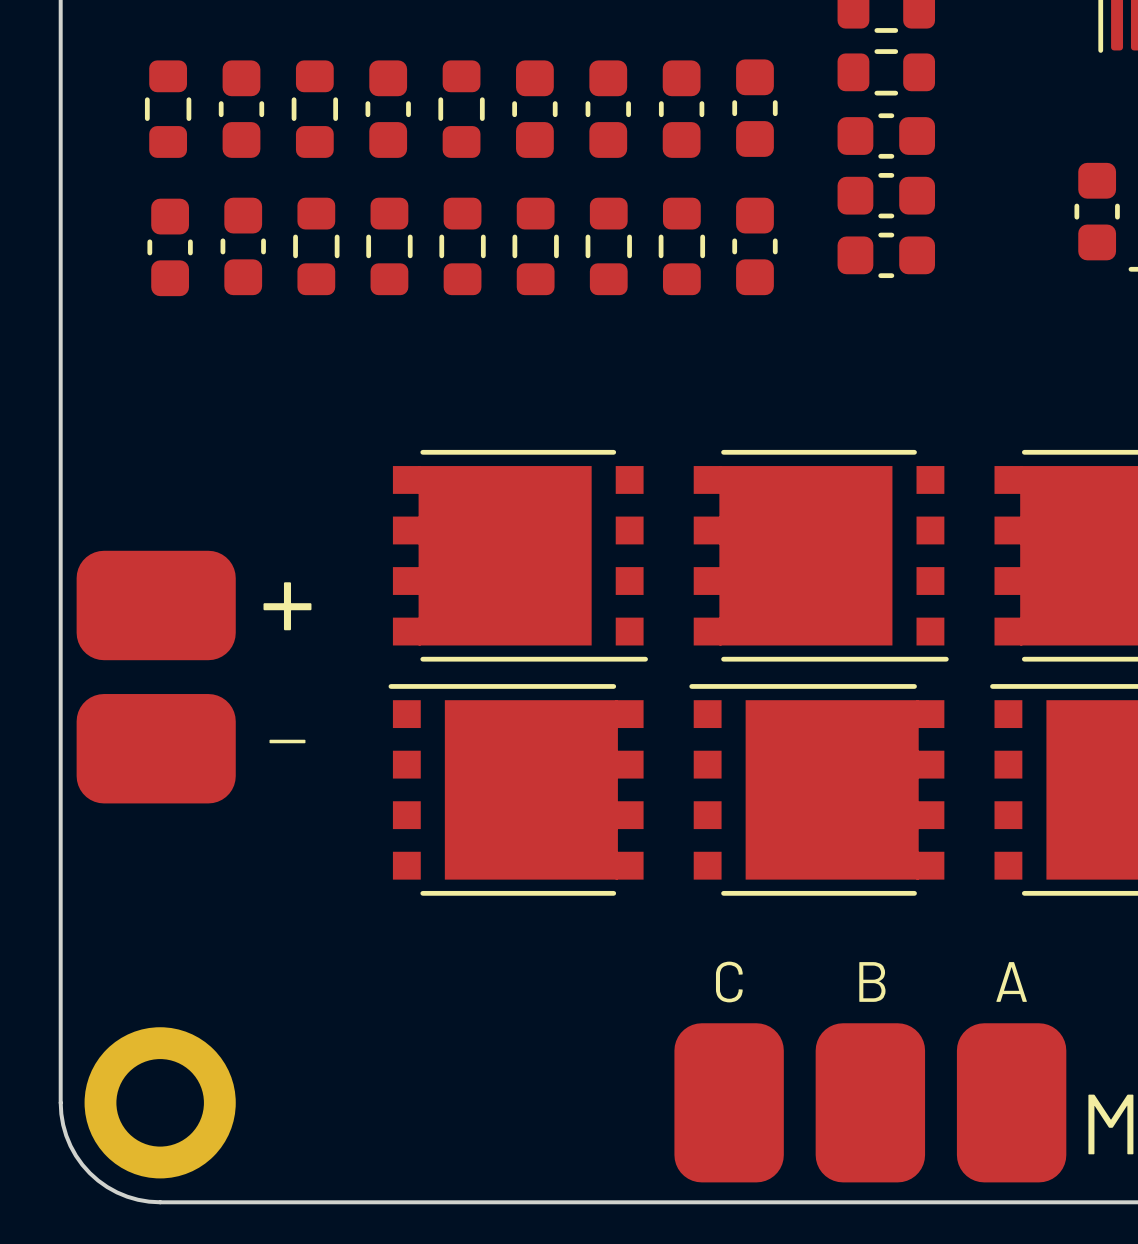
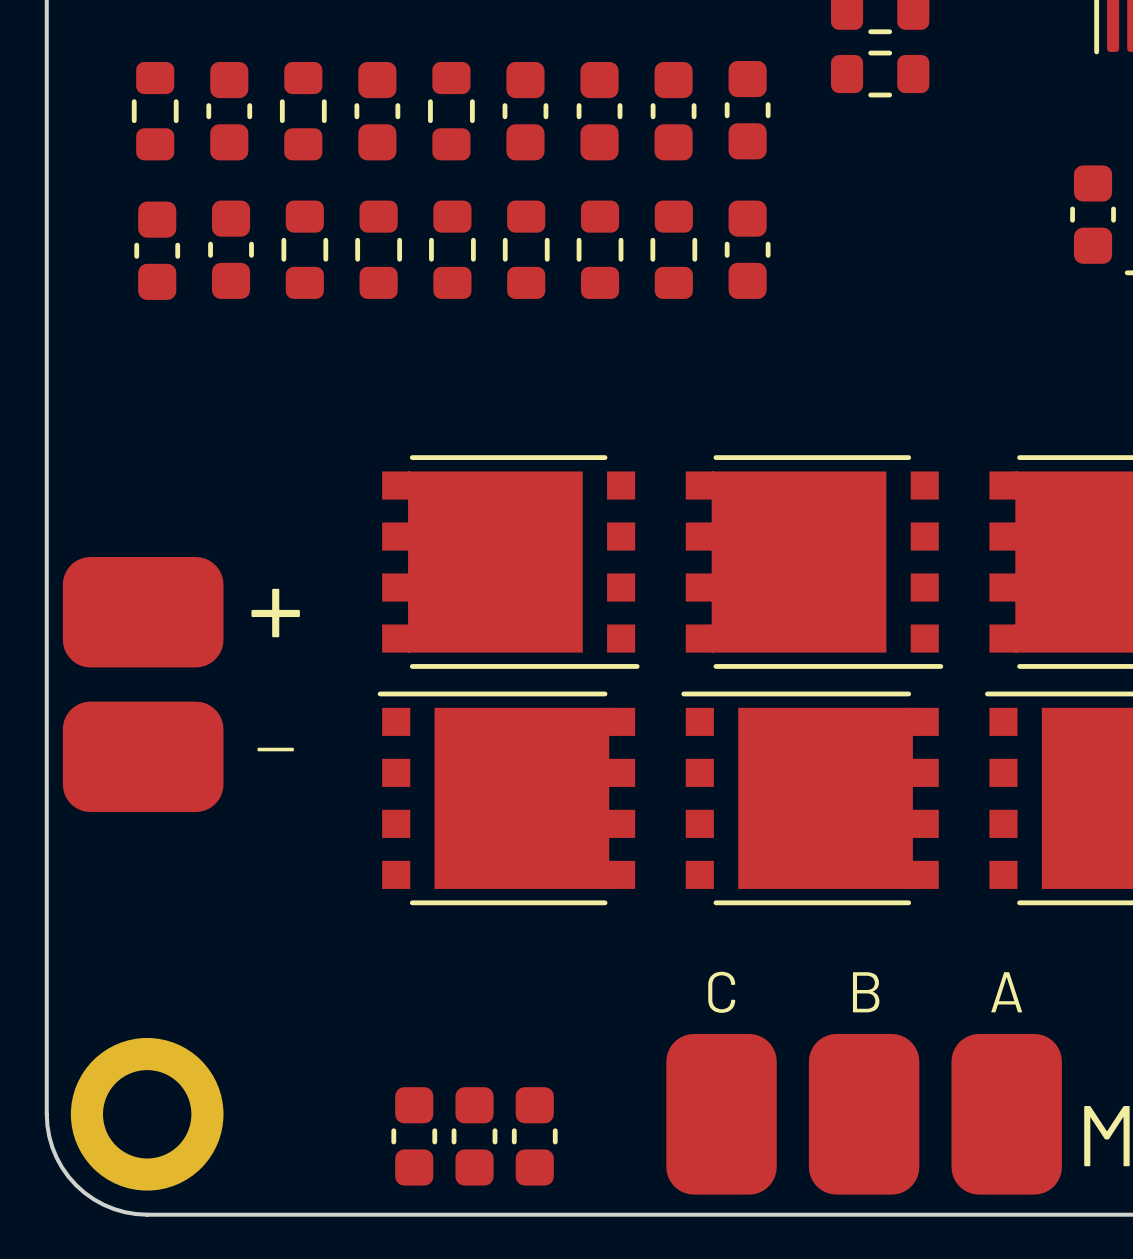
part: (886, 136) -> none
part: (886, 195) -> none
part: (886, 255) -> none
part: none -> (414, 1136)
part: none -> (474, 1136)
part: none -> (534, 1136)

